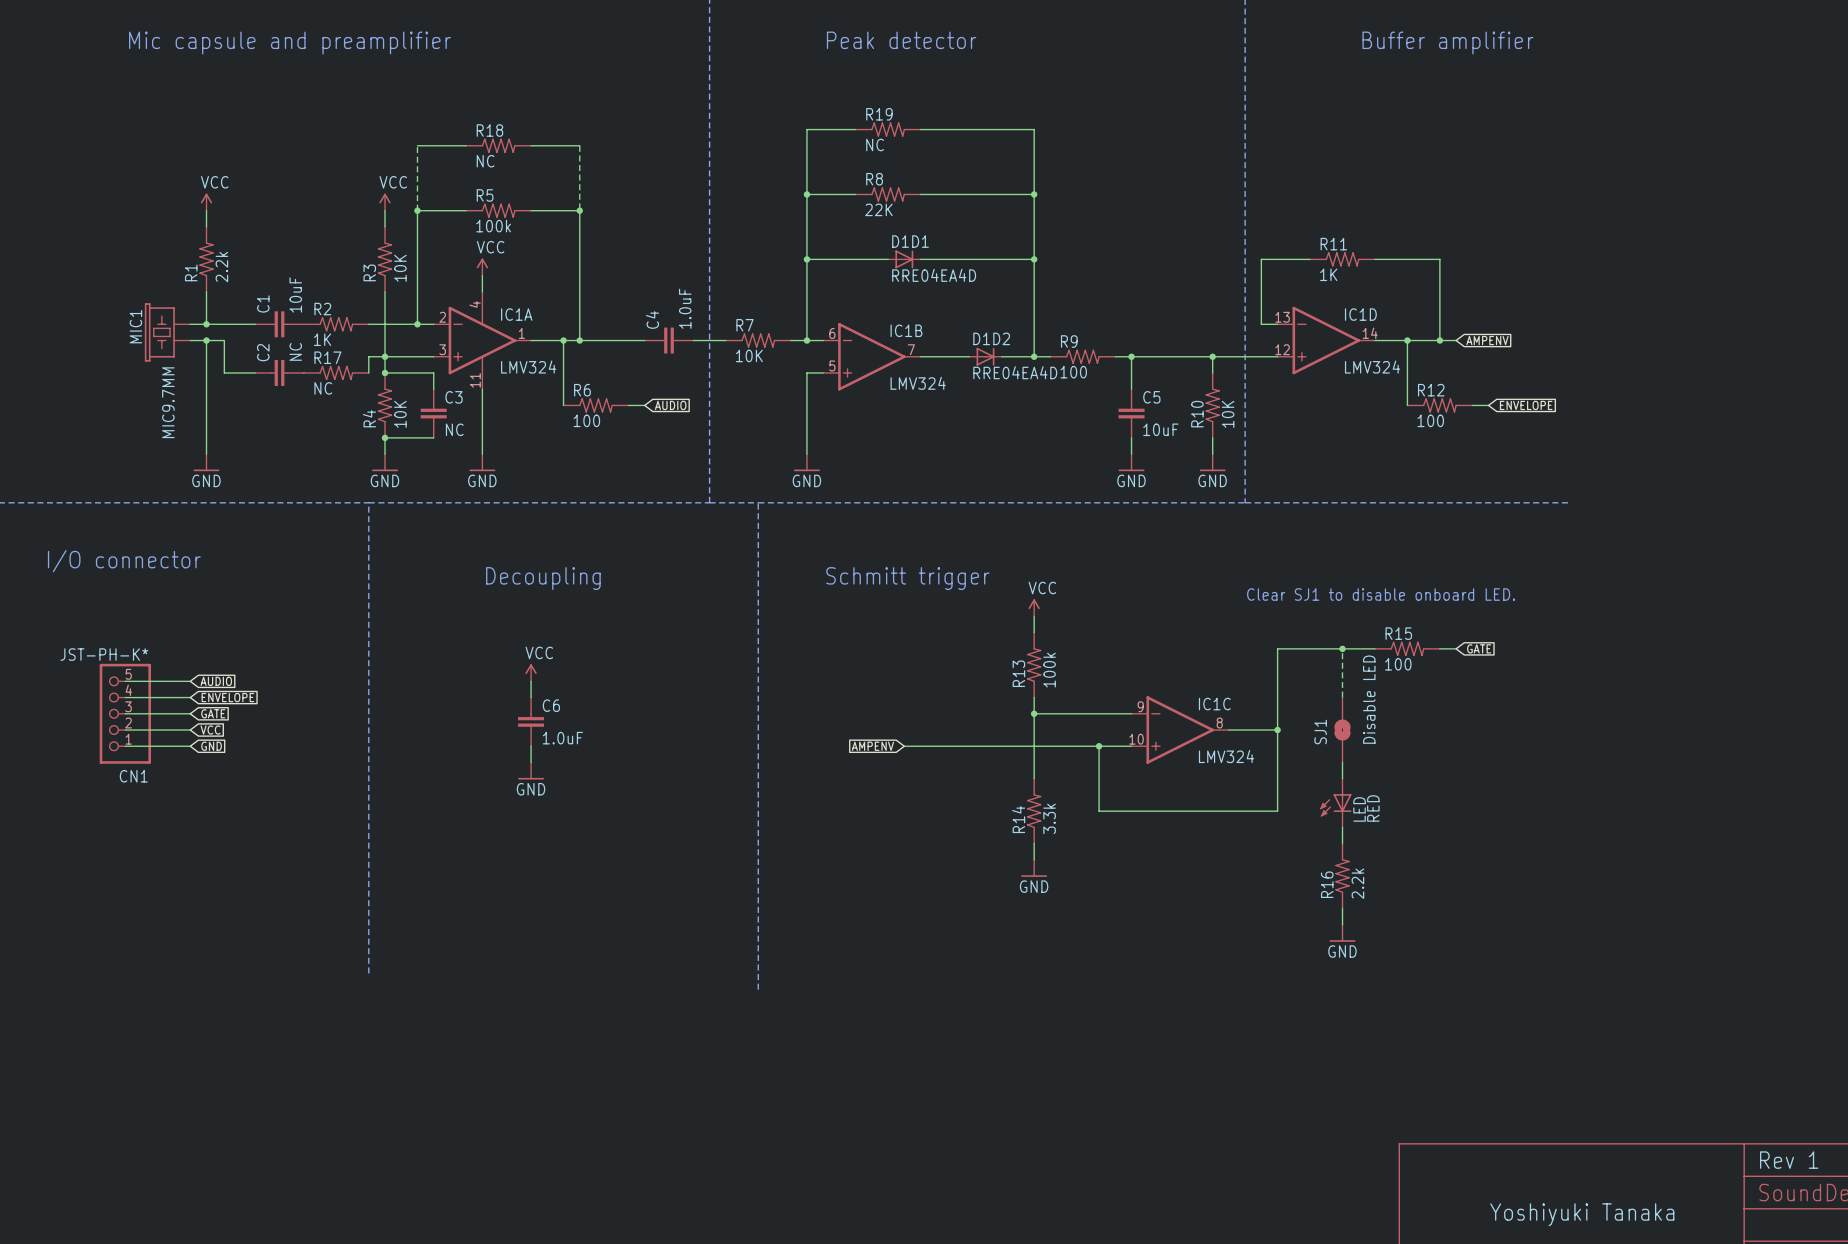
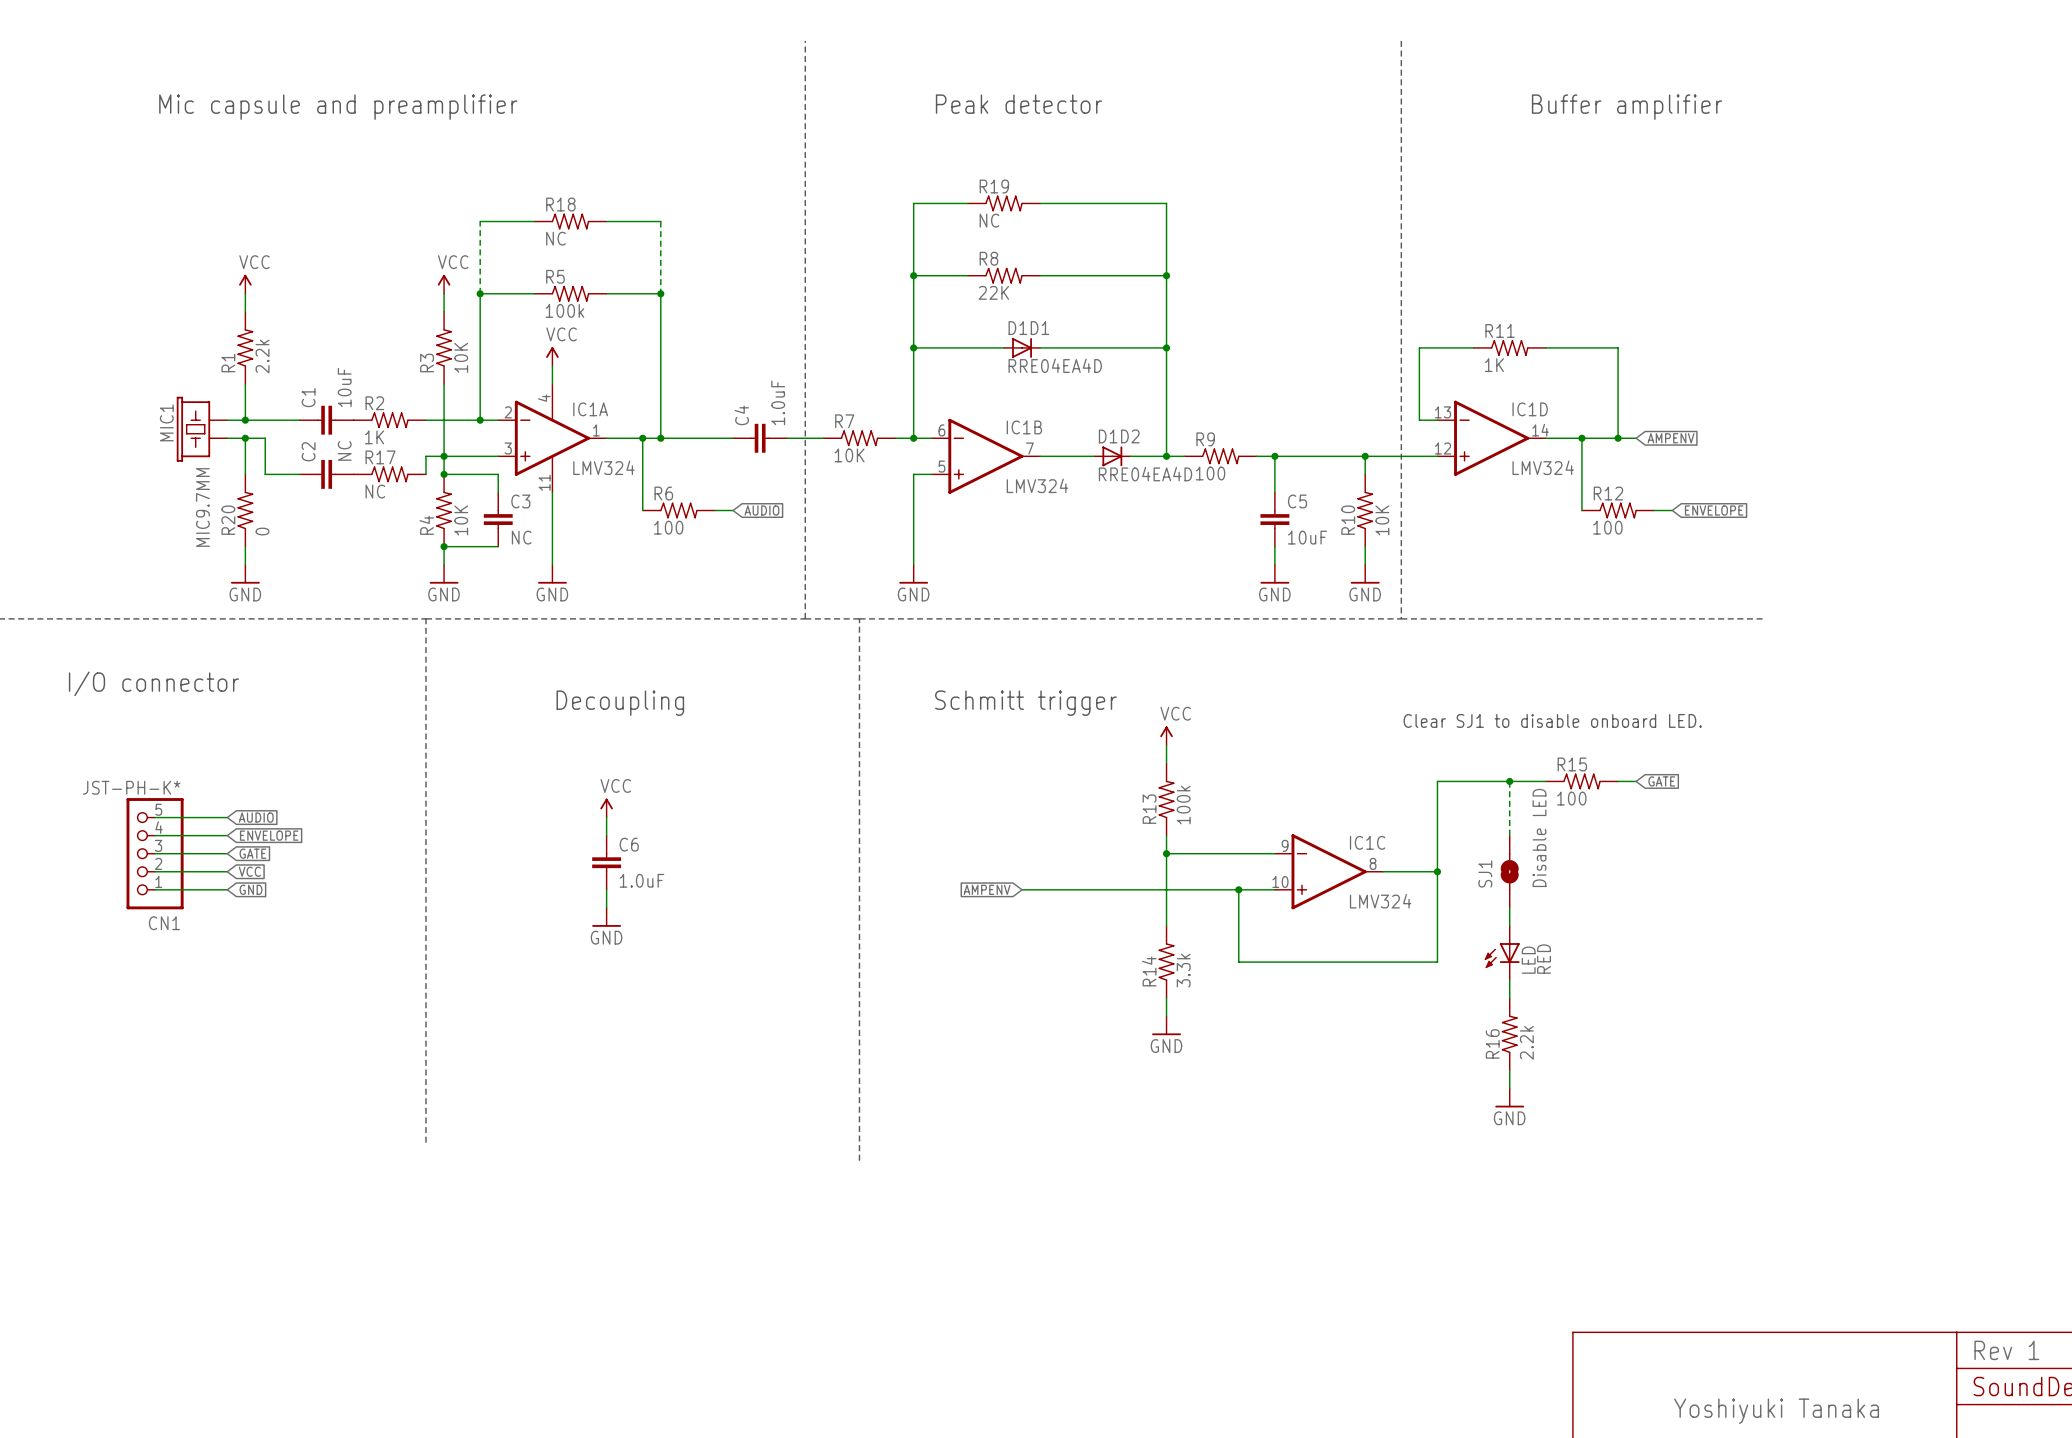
R20: none -> 0 (245, 510)

